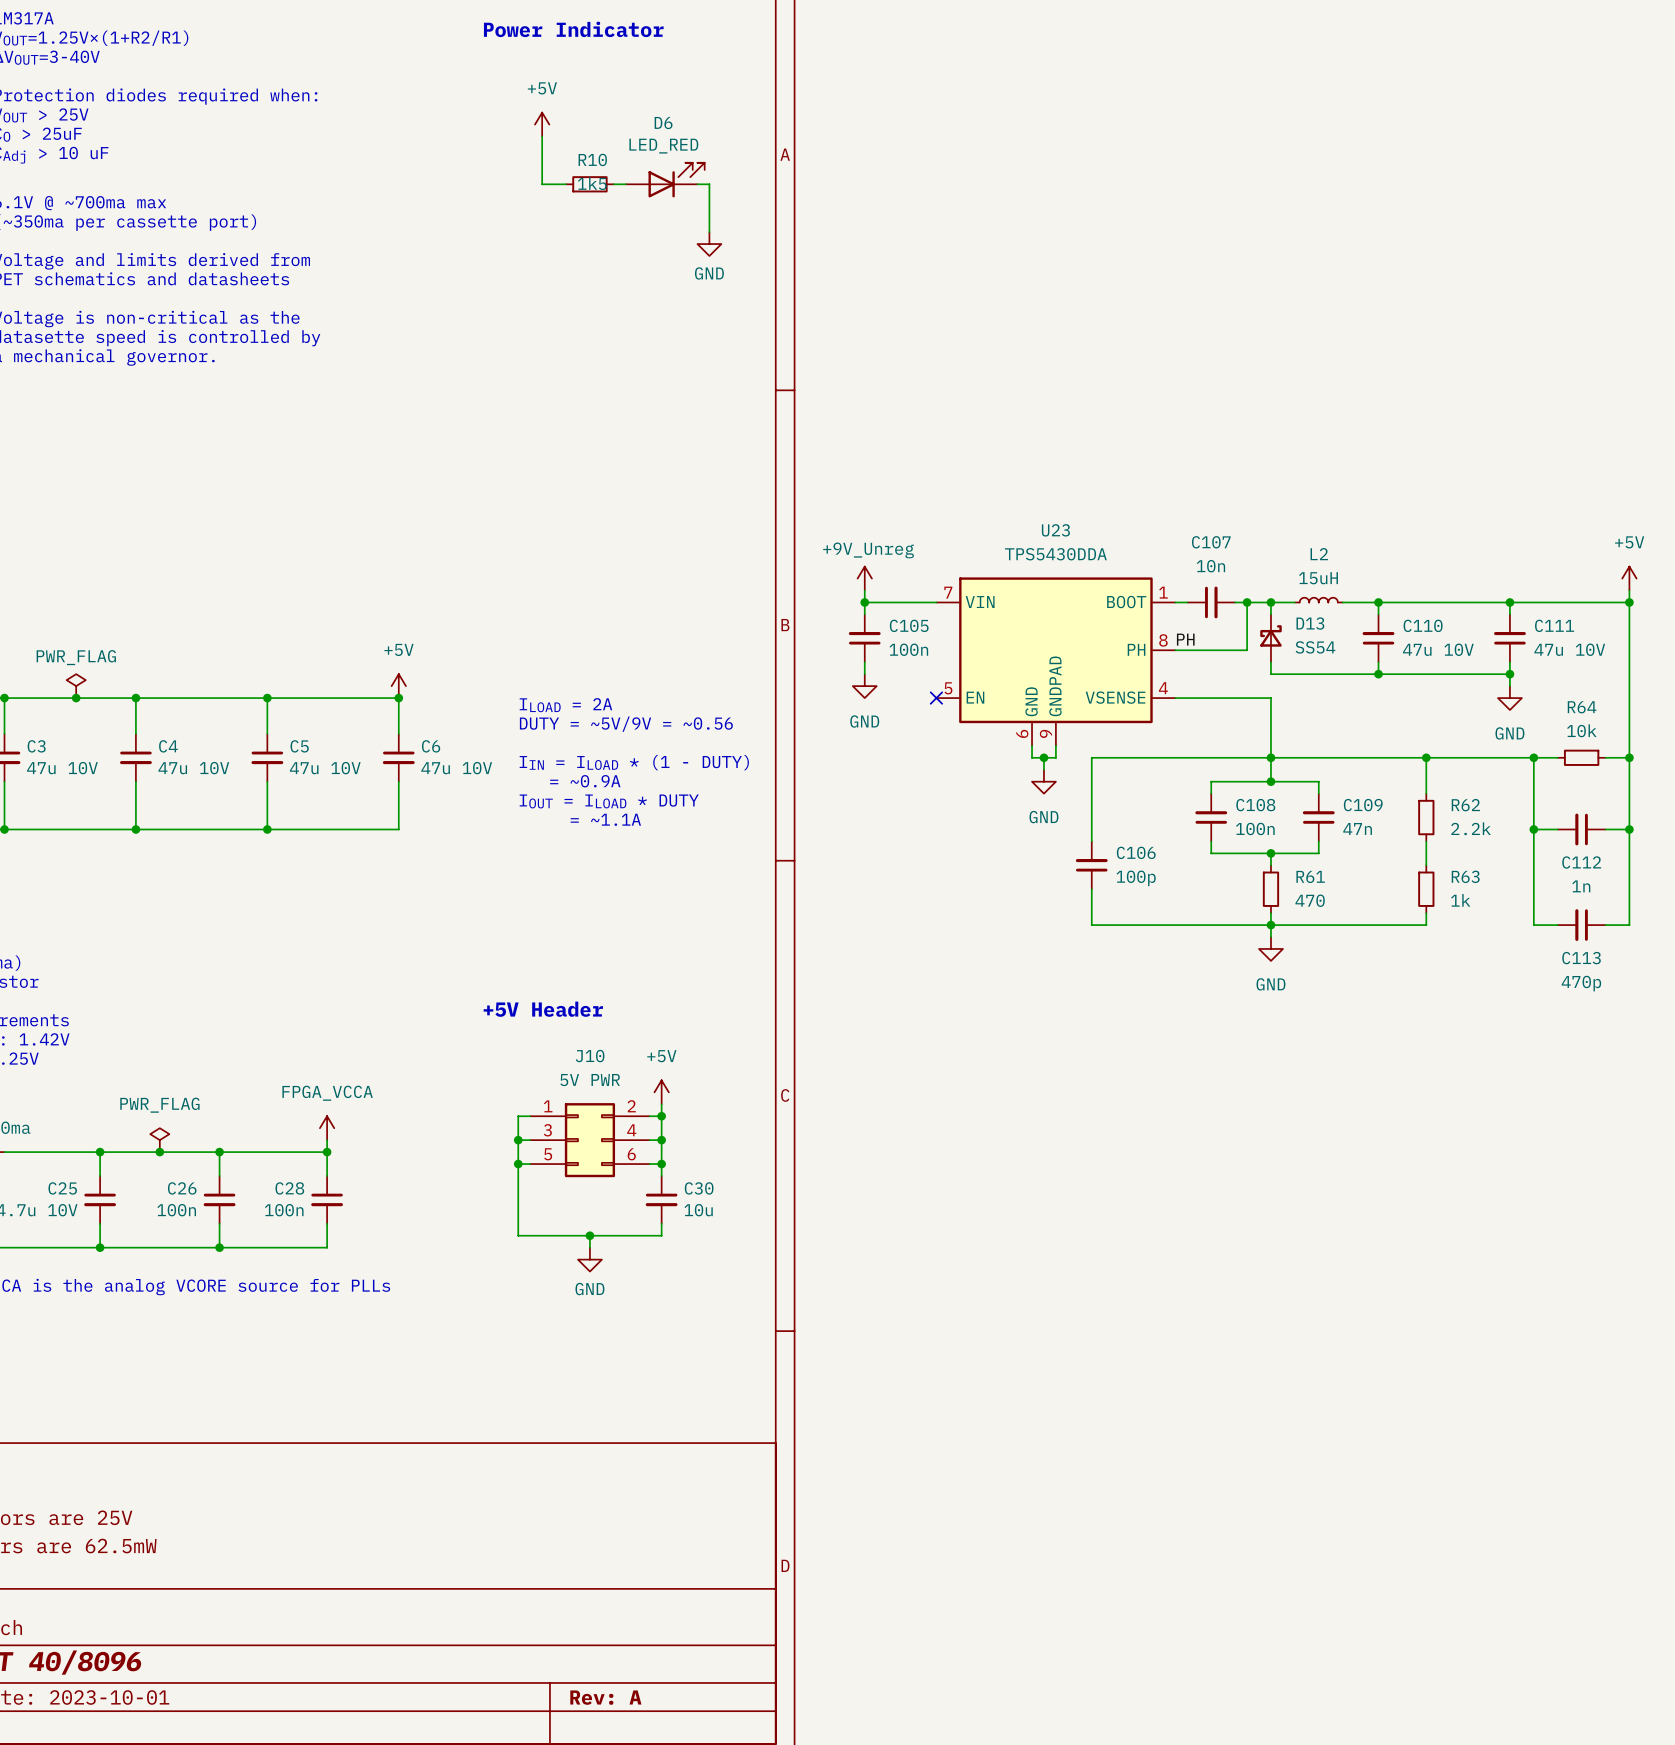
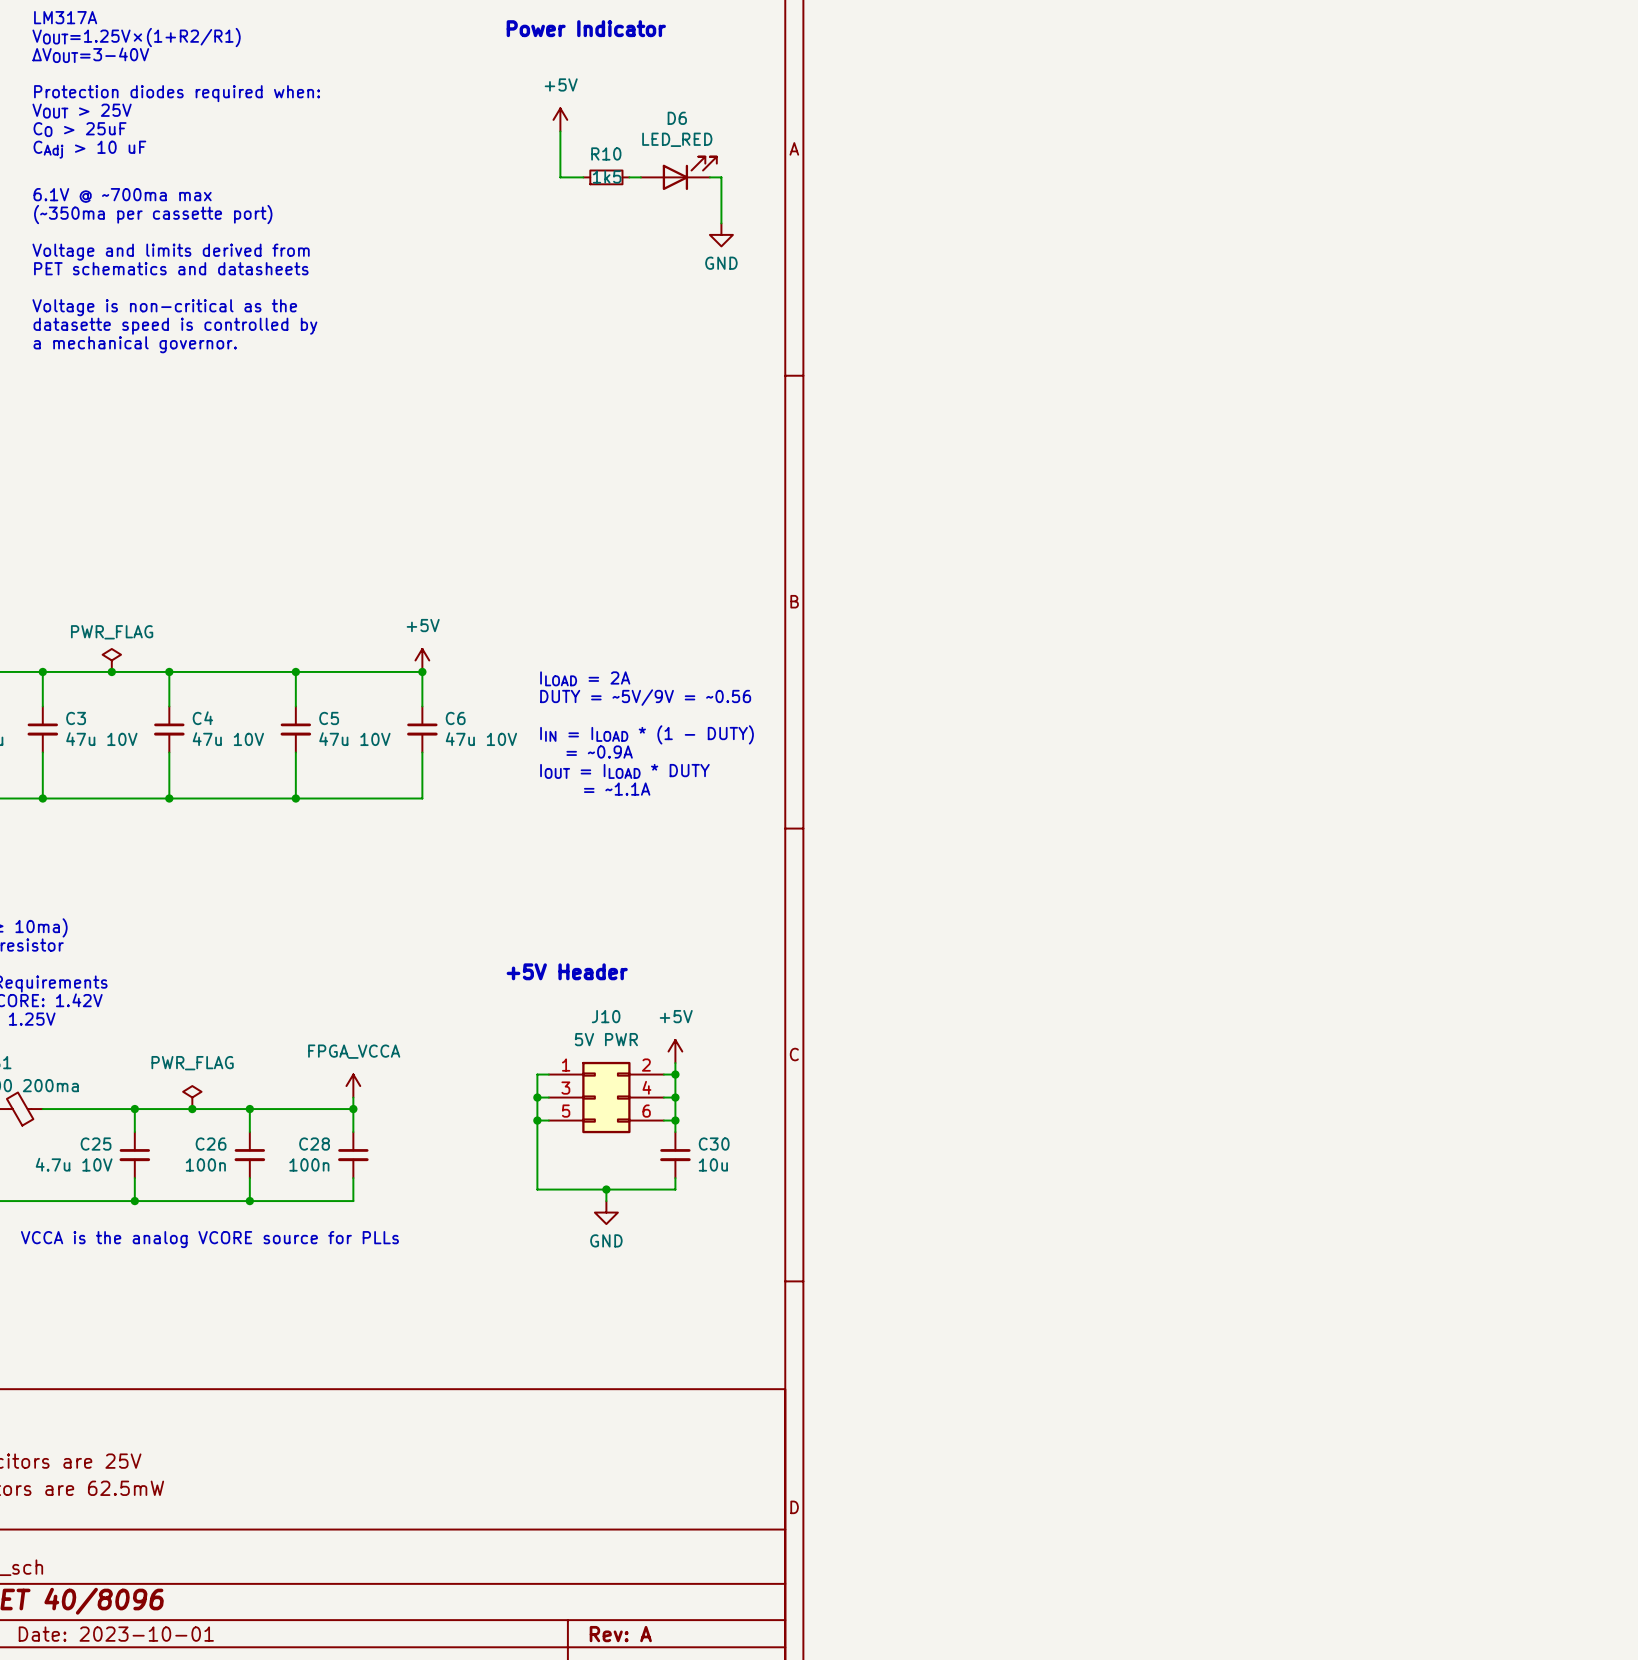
power symbol: +9V_Unreg (864, 578) -> none
power symbol: +5V (1629, 578) -> none
wire: (864, 590) (864, 614) -> none
wire: (1629, 590) (1629, 925) (1605, 925) -> none
L2: 15uH (1318, 600) -> none
wire: (864, 602) (936, 602) -> none
junction: (864, 602) -> none
wire: (1175, 602) (1187, 602) -> none
C107: 10n (1211, 602) -> none
wire: (1235, 602) (1294, 602) -> none
wire: (1247, 602) (1247, 650) (1175, 650) -> none
junction: (1247, 602) -> none
wire: (1270, 602) (1270, 614) -> none
junction: (1270, 602) -> none
wire: (1342, 602) (1629, 602) -> none
wire: (1378, 602) (1378, 614) -> none
junction: (1378, 602) -> none
wire: (1509, 602) (1509, 614) -> none
junction: (1509, 602) -> none
junction: (1629, 602) -> none
C105: 100n (864, 638) -> none
D13: SS54 (1270, 638) -> none
C110: 47u 10V (1378, 638) -> none
C111: 47u 10V (1509, 638) -> none
label: PH (1185, 639) -> none
U23: TPS5430DDA (1055, 661) -> none
wire: (864, 662) (864, 674) -> none
wire: (1270, 662) (1270, 674) (1509, 674) -> none
wire: (1378, 662) (1378, 674) -> none
wire: (1509, 662) (1509, 686) -> none
junction: (1378, 674) -> none
junction: (1509, 674) -> none
power symbol: GND (864, 686) -> none
no-connect mark: (936, 698) -> none
wire: (1175, 698) (1270, 698) (1270, 781) -> none
power symbol: GND (1509, 698) -> none
wire: (1032, 745) (1032, 757) (1055, 757) (1055, 745) -> none
wire: (1043, 757) (1043, 769) -> none
junction: (1043, 757) -> none
junction: (1270, 757) -> none
wire: (1426, 757) (1426, 793) -> none
junction: (1426, 757) -> none
wire: (1533, 757) (1533, 925) (1557, 925) -> none
junction: (1533, 757) -> none
wire: (1557, 757) (1091, 757) (1091, 841) -> none
R64: 10k (1581, 757) -> none
wire: (1605, 757) (1629, 757) -> none
junction: (1629, 757) -> none
power symbol: GND (1043, 781) -> none
junction: (1270, 781) -> none
wire: (1211, 793) (1211, 781) (1318, 781) (1318, 793) -> none
C108: 100n (1211, 817) -> none
C109: 47n (1318, 817) -> none
R62: 2.2k (1426, 817) -> none
wire: (1533, 829) (1557, 829) -> none
junction: (1533, 829) -> none
C112: 1n (1581, 829) -> none
wire: (1605, 829) (1629, 829) -> none
junction: (1629, 829) -> none
wire: (1211, 841) (1211, 853) (1318, 853) (1318, 841) -> none
wire: (1426, 841) (1426, 865) -> none
wire: (1270, 853) (1270, 865) -> none
junction: (1270, 853) -> none
C106: 100p (1091, 865) -> none
wire: (1091, 889) (1091, 925) (1426, 925) (1426, 913) -> none
R61: 470 (1270, 889) -> none
R63: 1k (1426, 889) -> none
wire: (1270, 913) (1270, 937) -> none
junction: (1270, 925) -> none
C113: 470p (1581, 925) -> none
power symbol: GND (1270, 948) -> none

